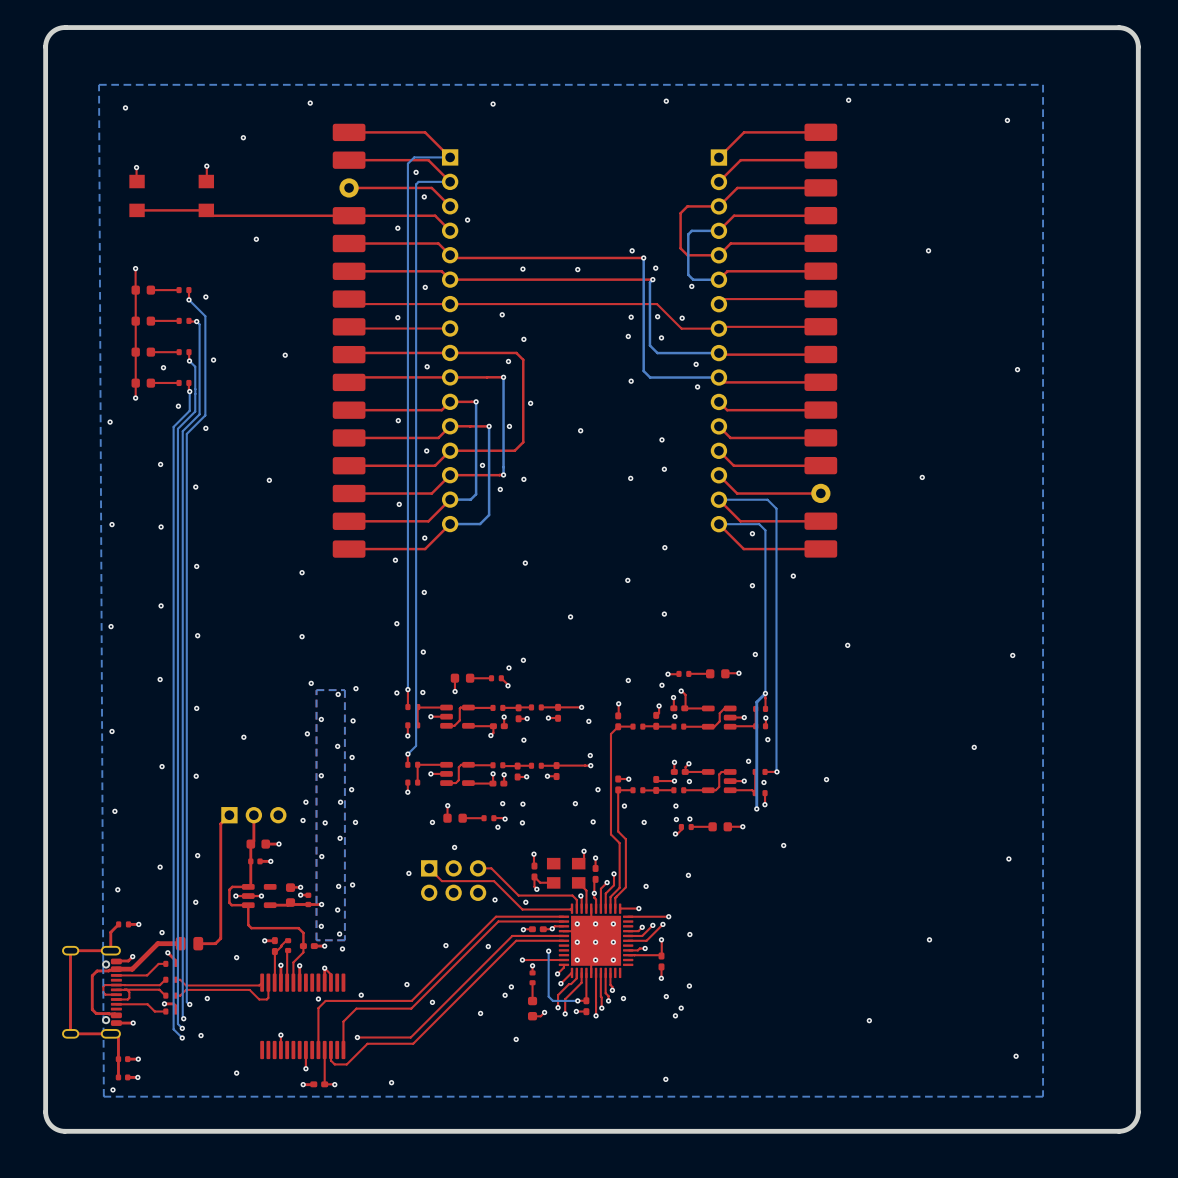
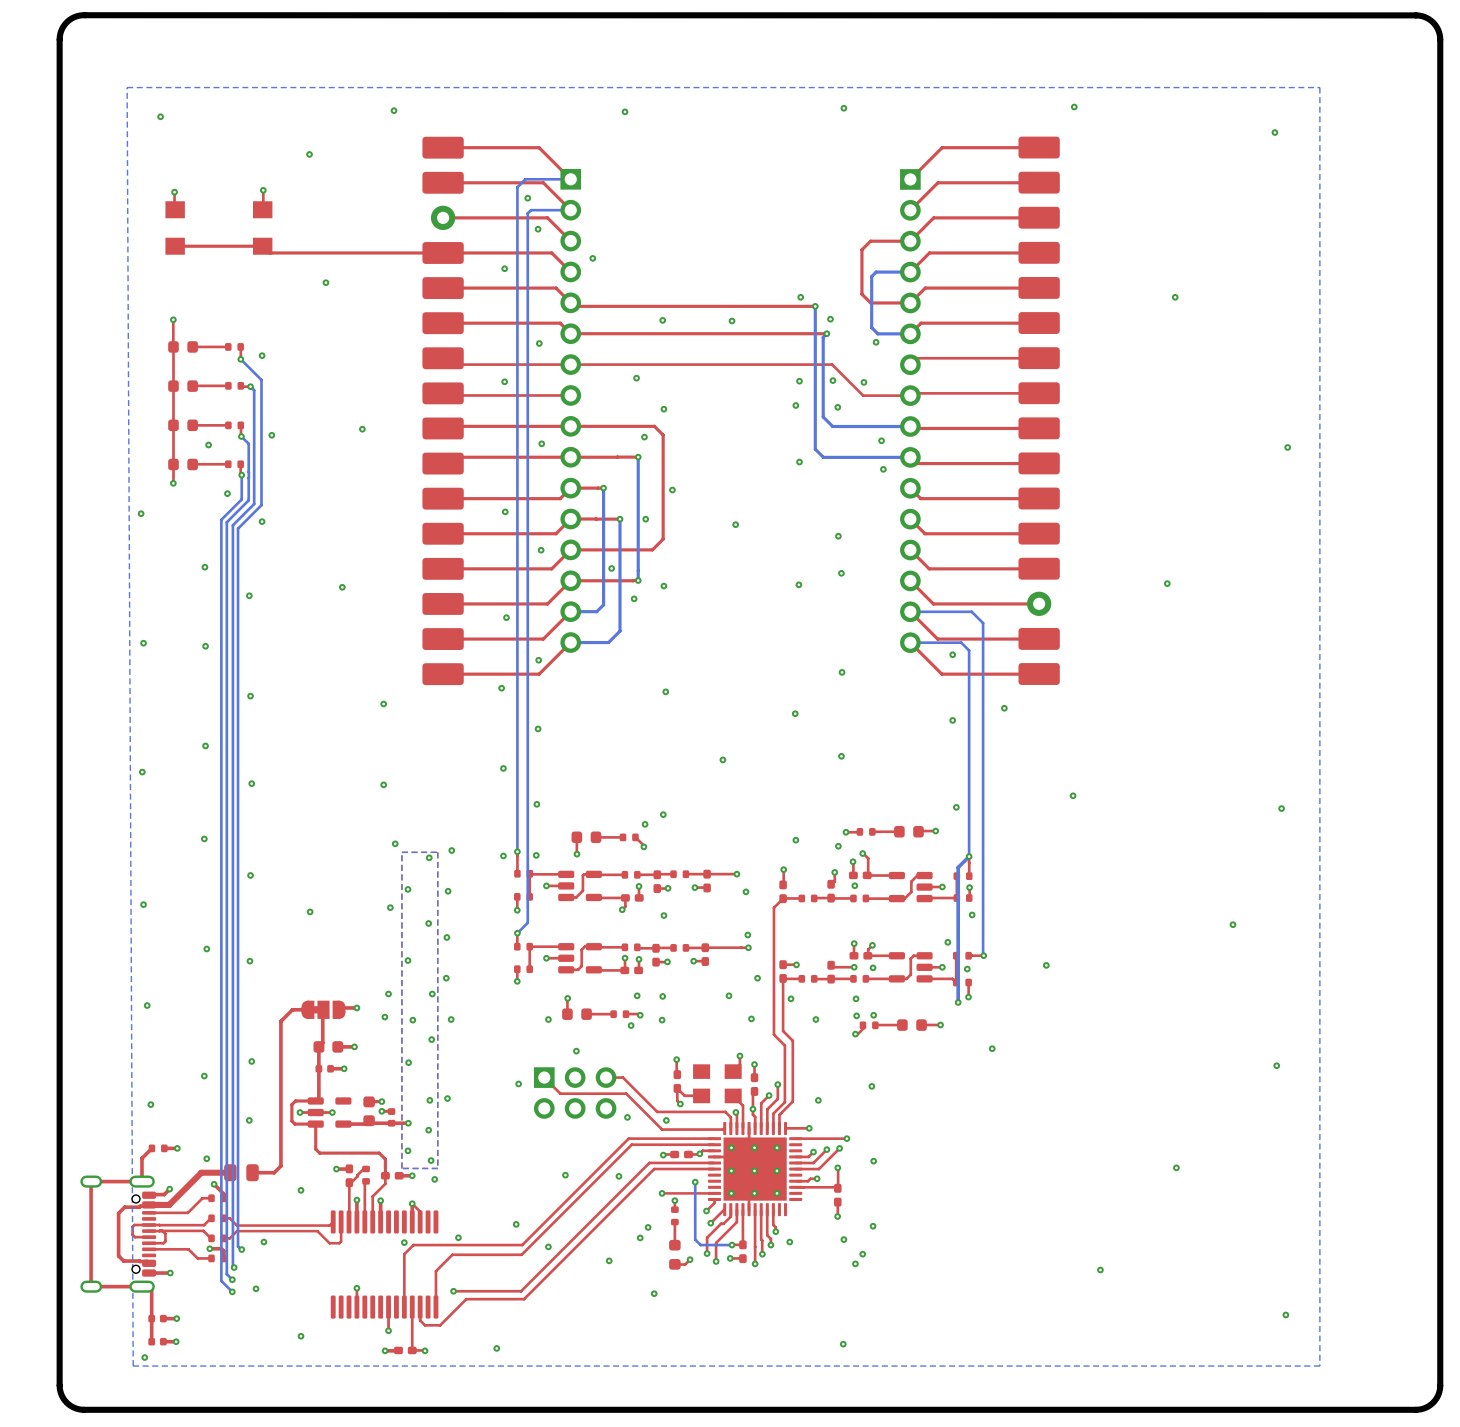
part footprint: [221, 807, 287, 824] -> [301, 1000, 346, 1019]
top track: none -> (356, 1007) (341, 1007) (339, 1009)
via: none -> (356, 1007)
top track: none -> (307, 1009) (291, 1010)

